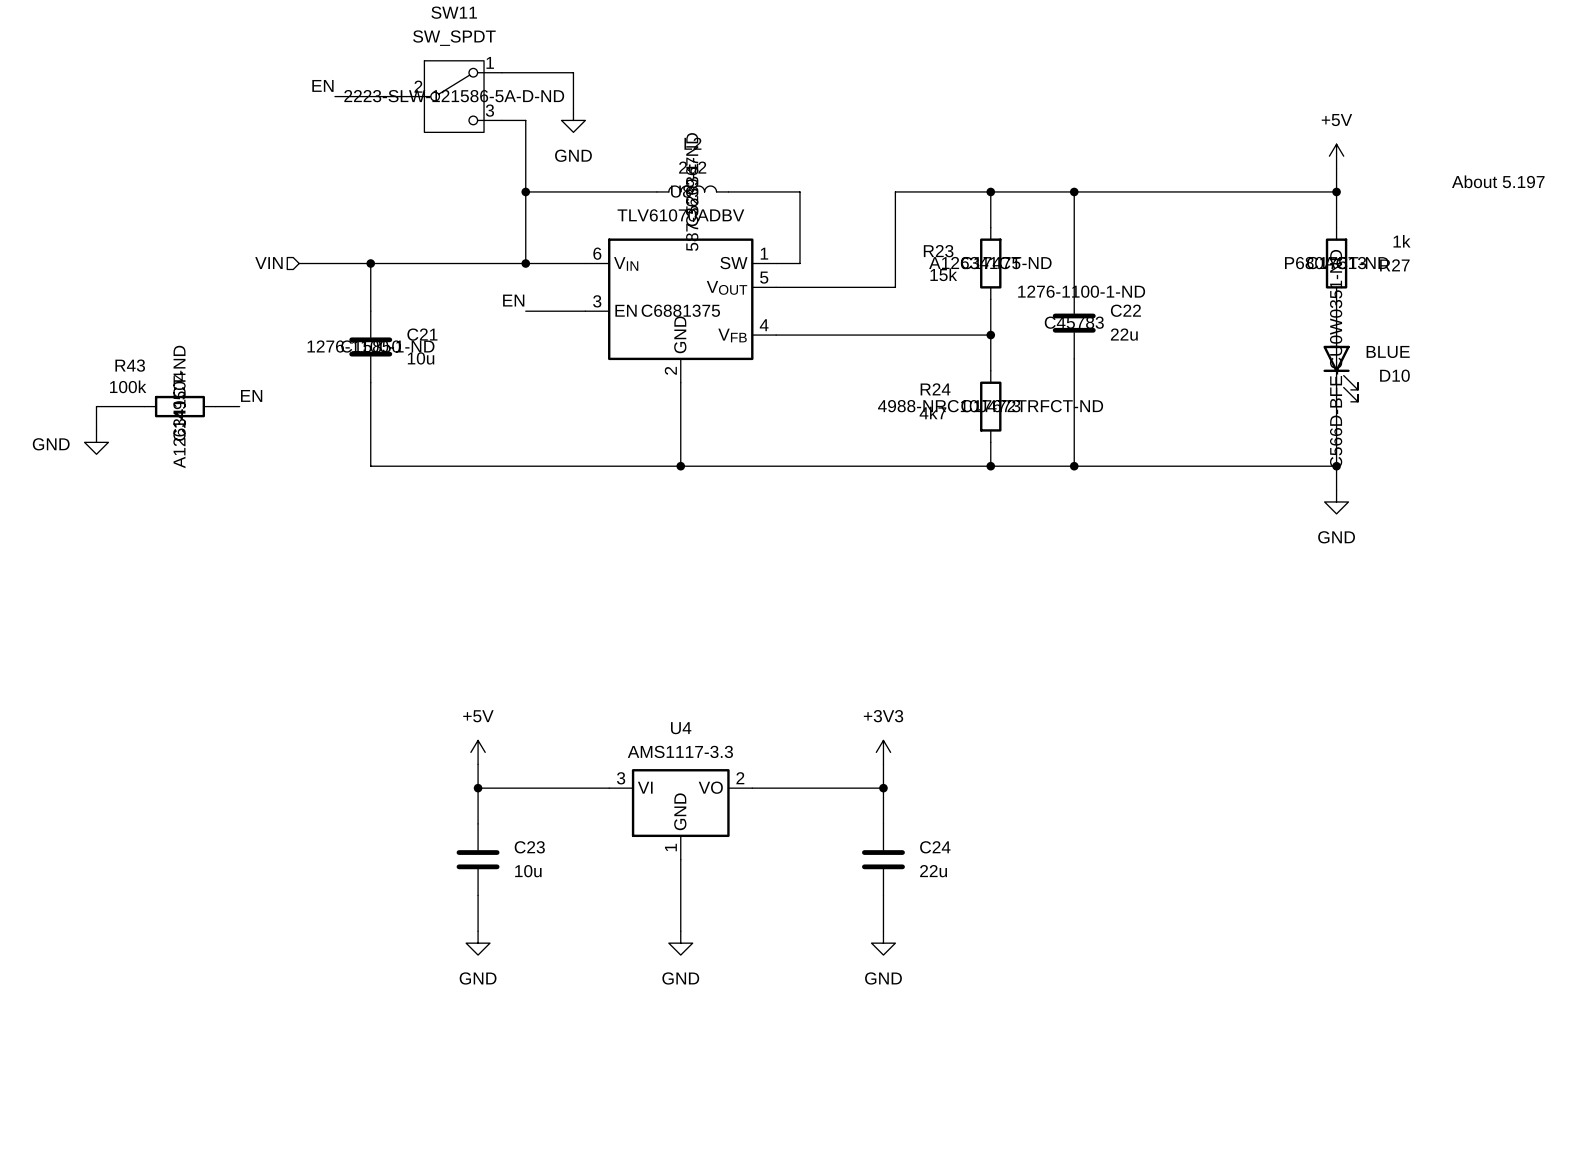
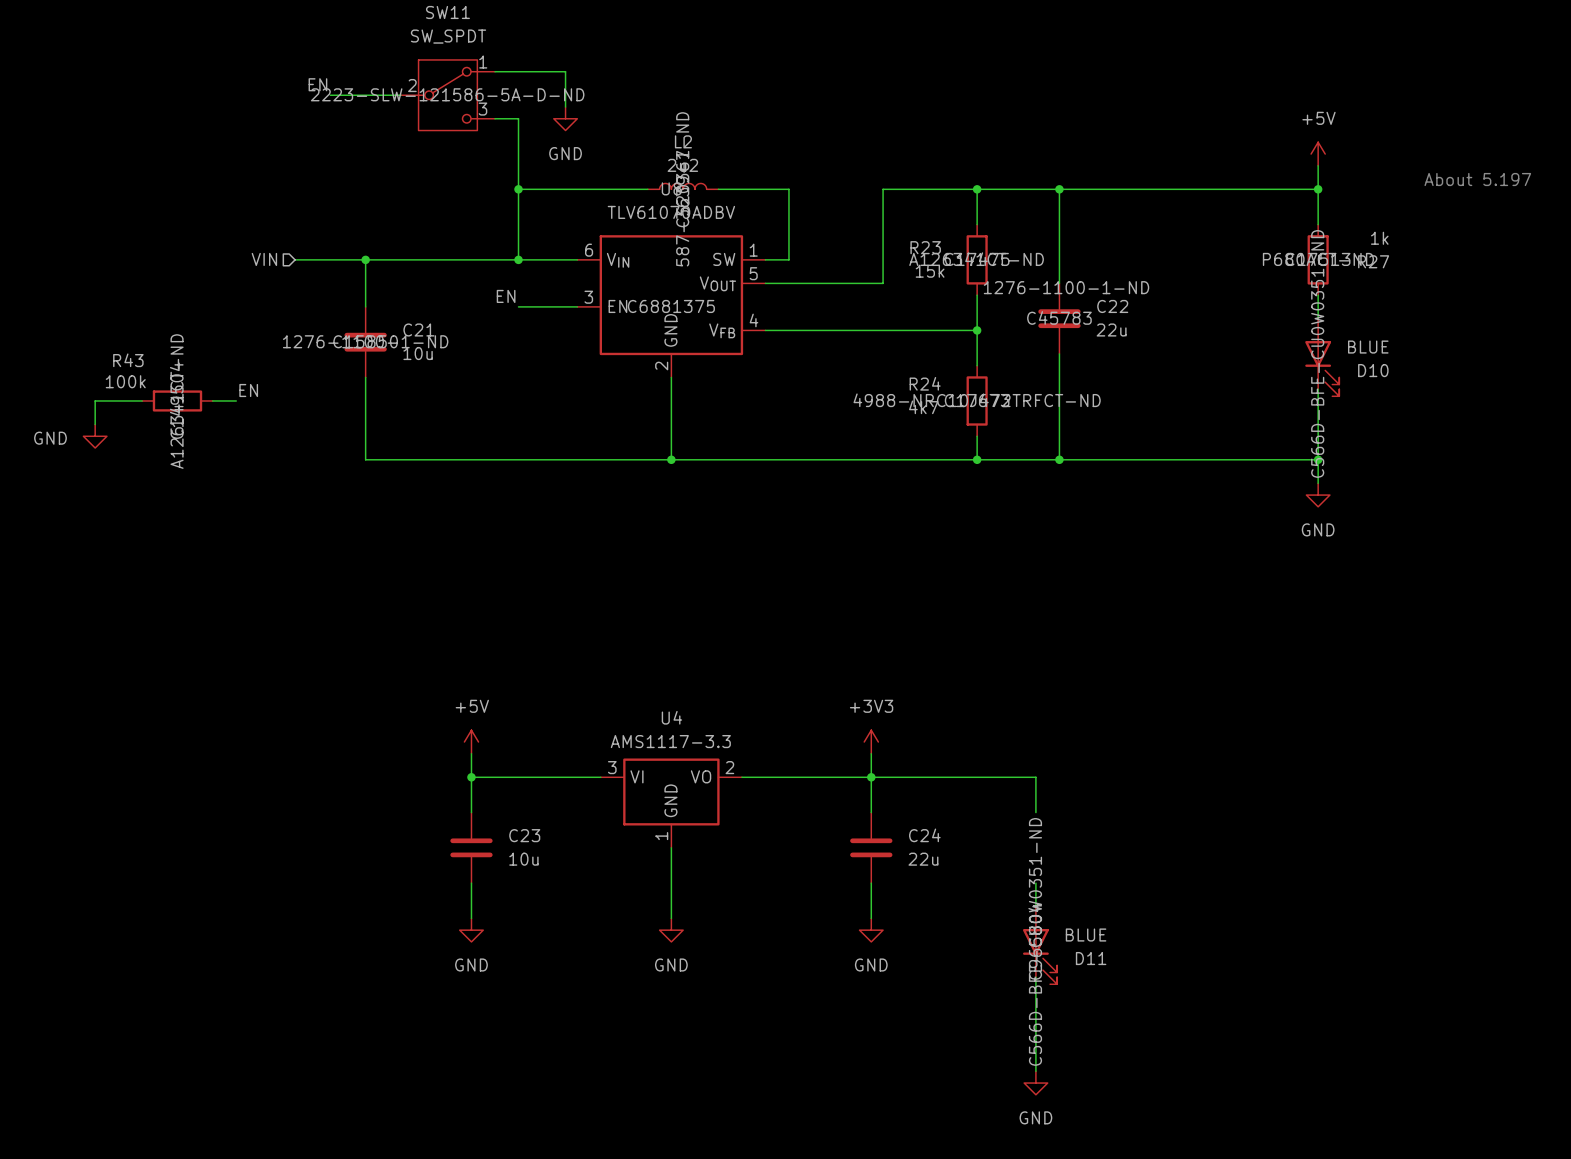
wire: none -> (871, 777) (1035, 777) (1035, 812)
wire: none -> (1035, 883) (1035, 906)
D11: none -> BLUE (1040, 945)
wire: none -> (1035, 977) (1035, 1071)
power symbol: none -> GND (1035, 1083)

